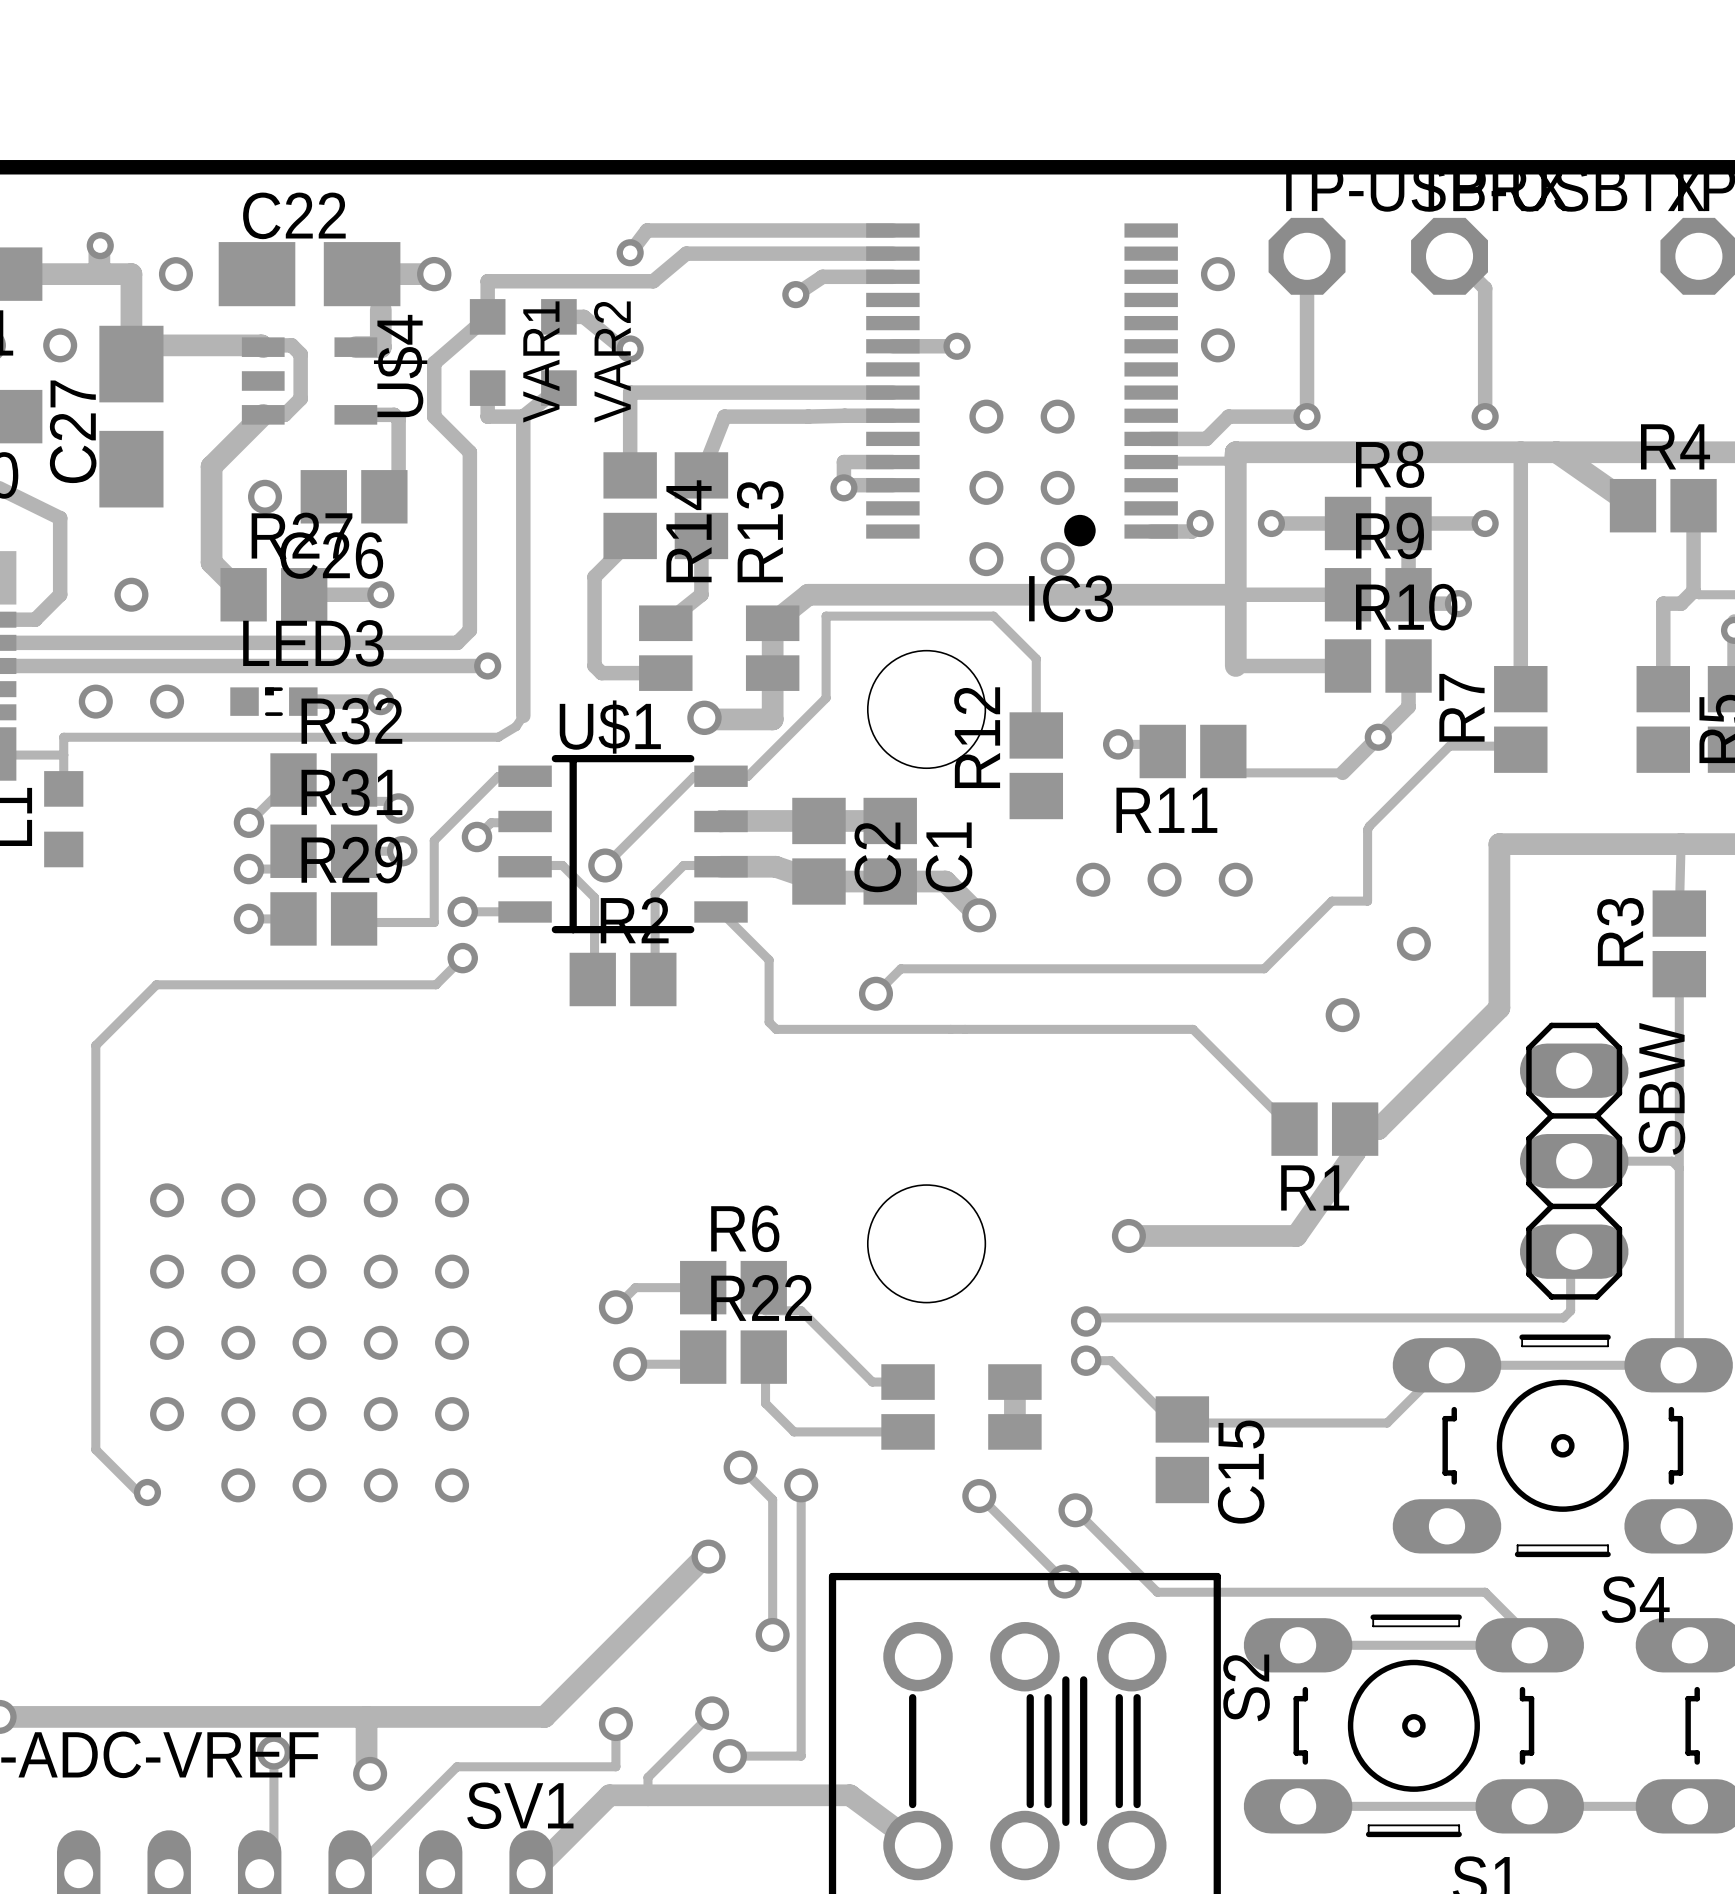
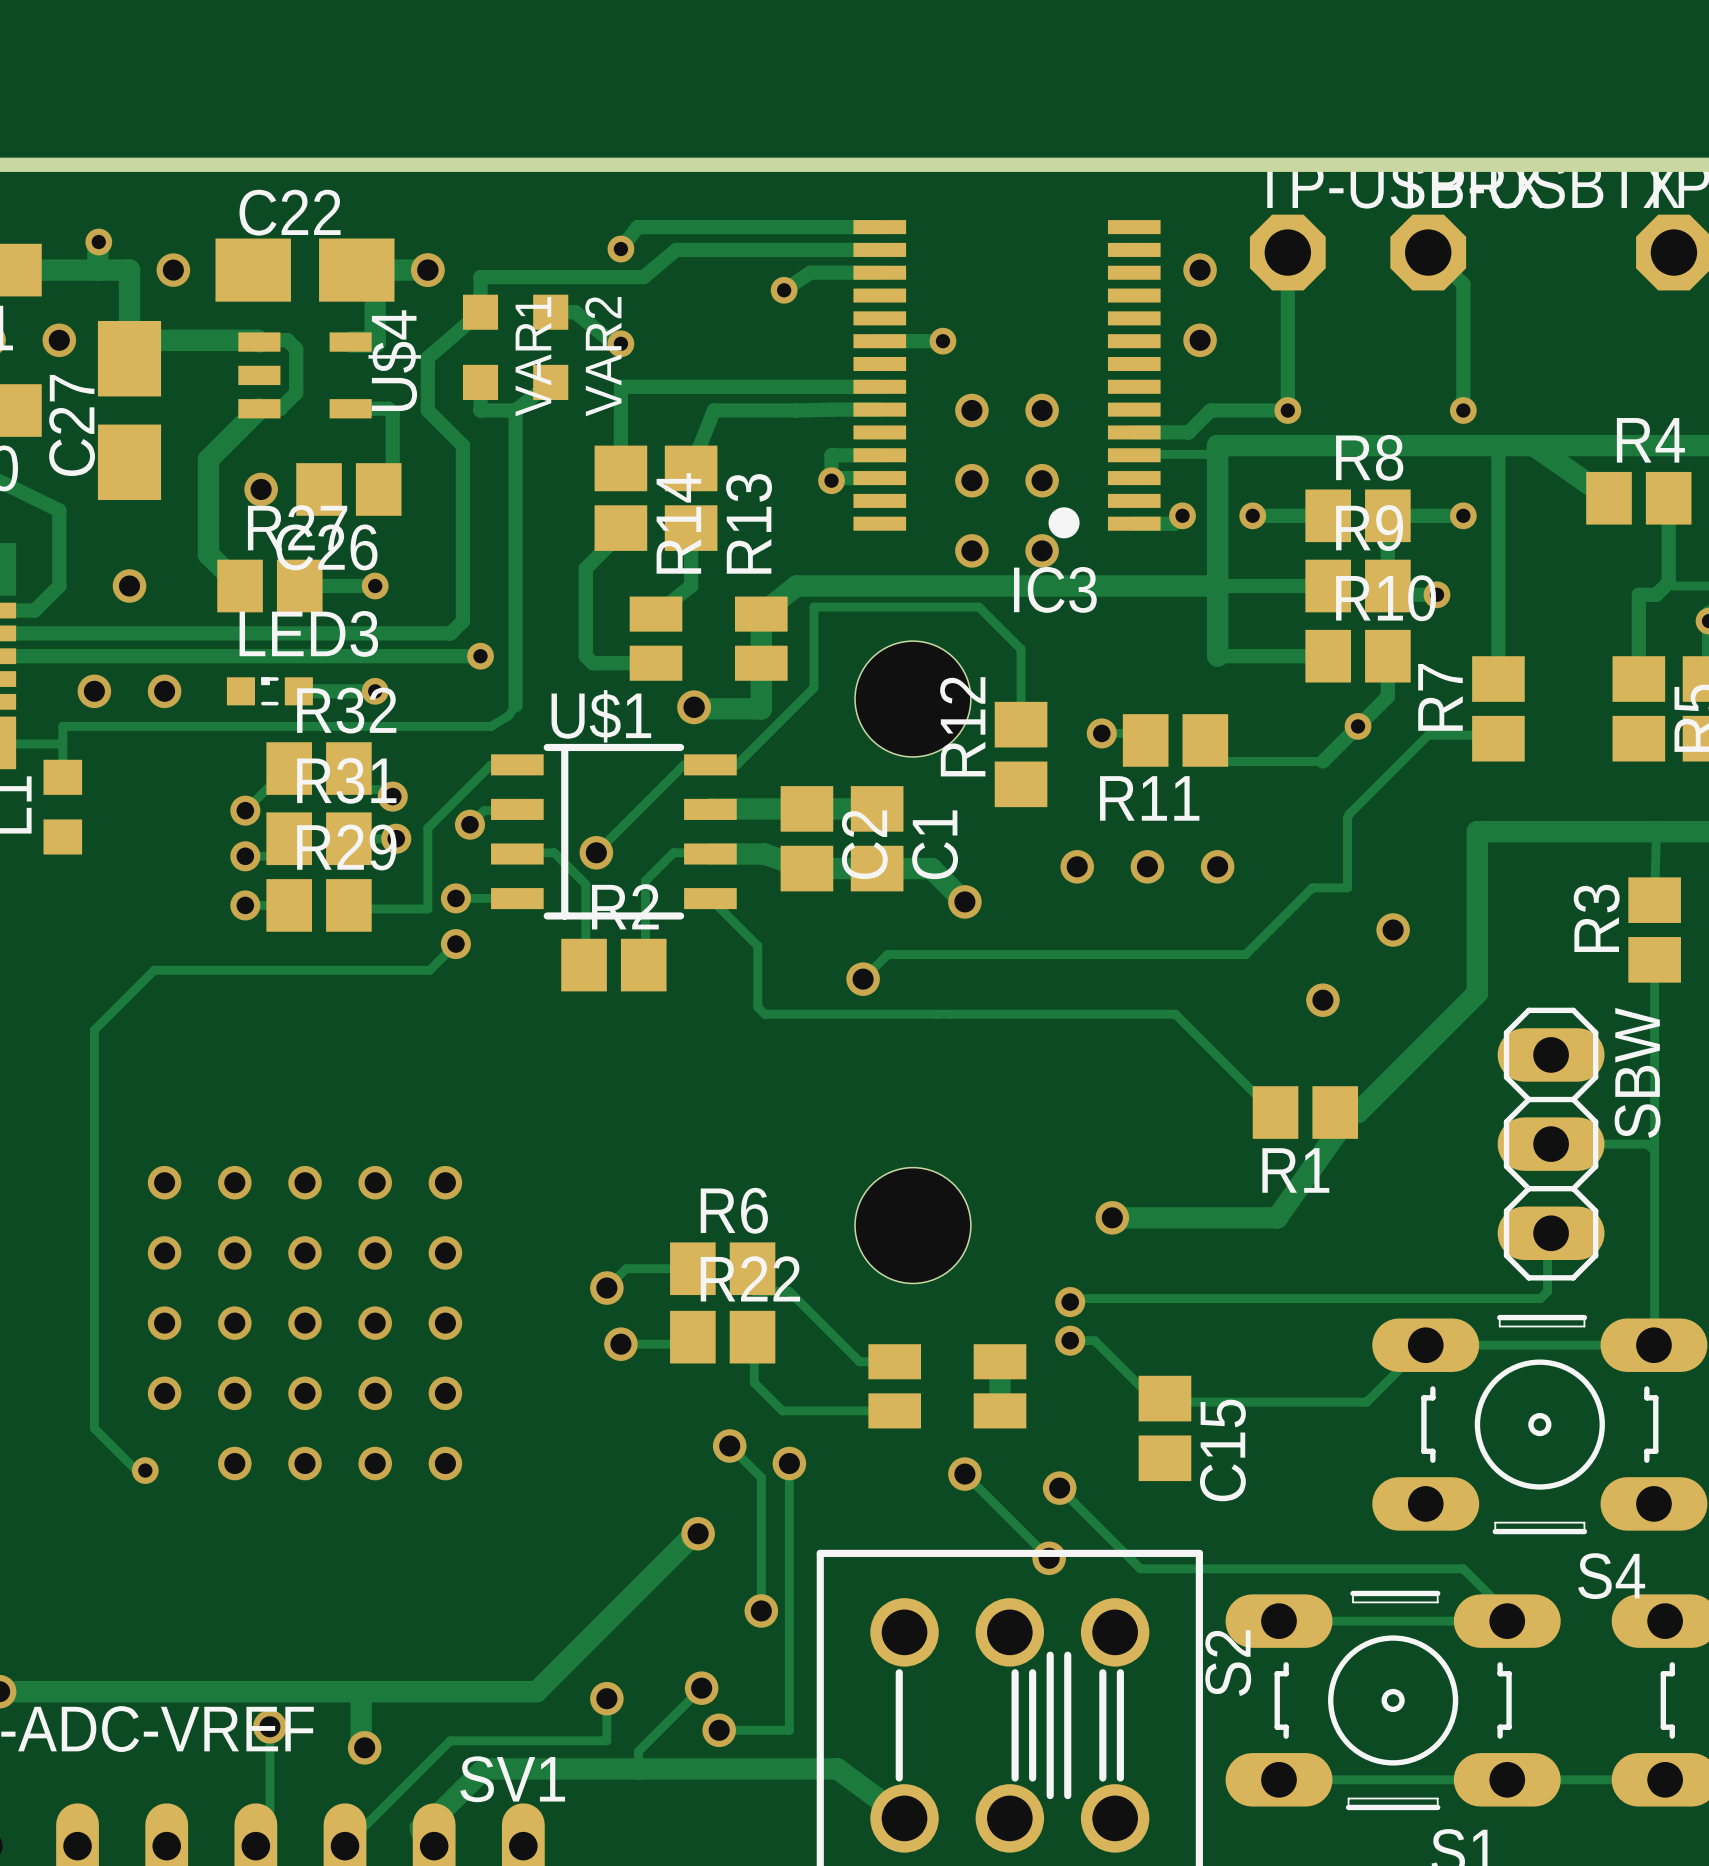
track: (609, 1795) (531, 1873) -> (600, 1768) (484, 1768) (434, 1818) (434, 1846) (426, 1844) (419, 1840) (415, 1833) (413, 1825)

